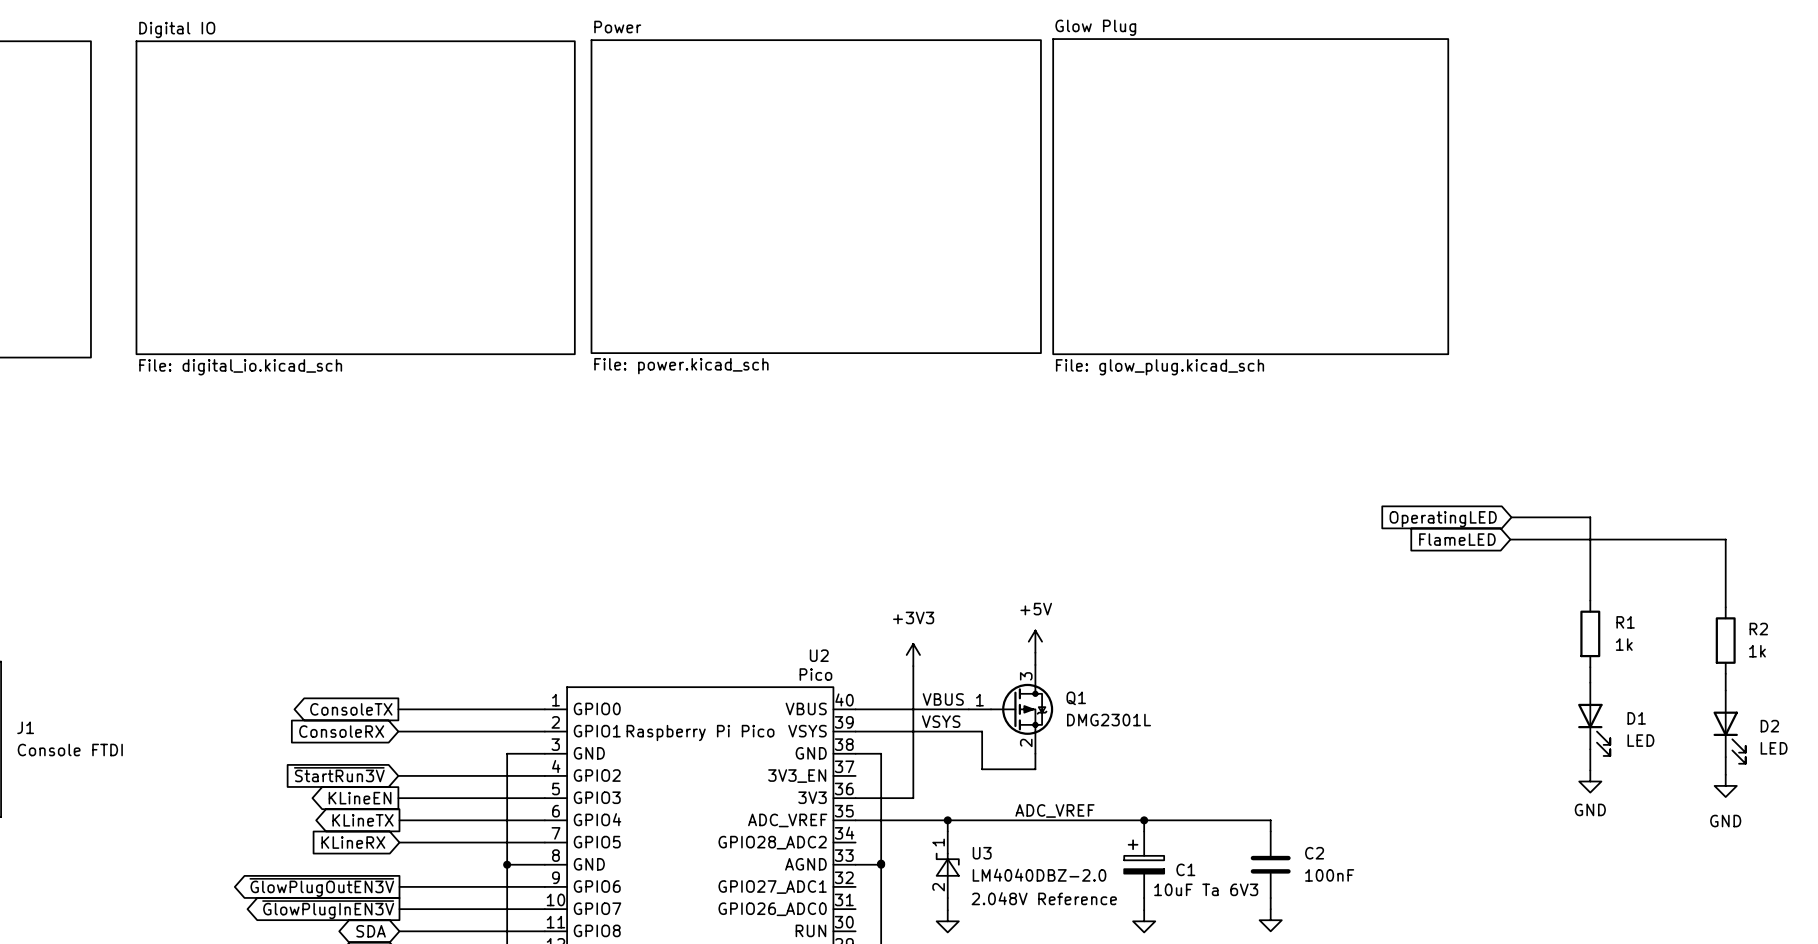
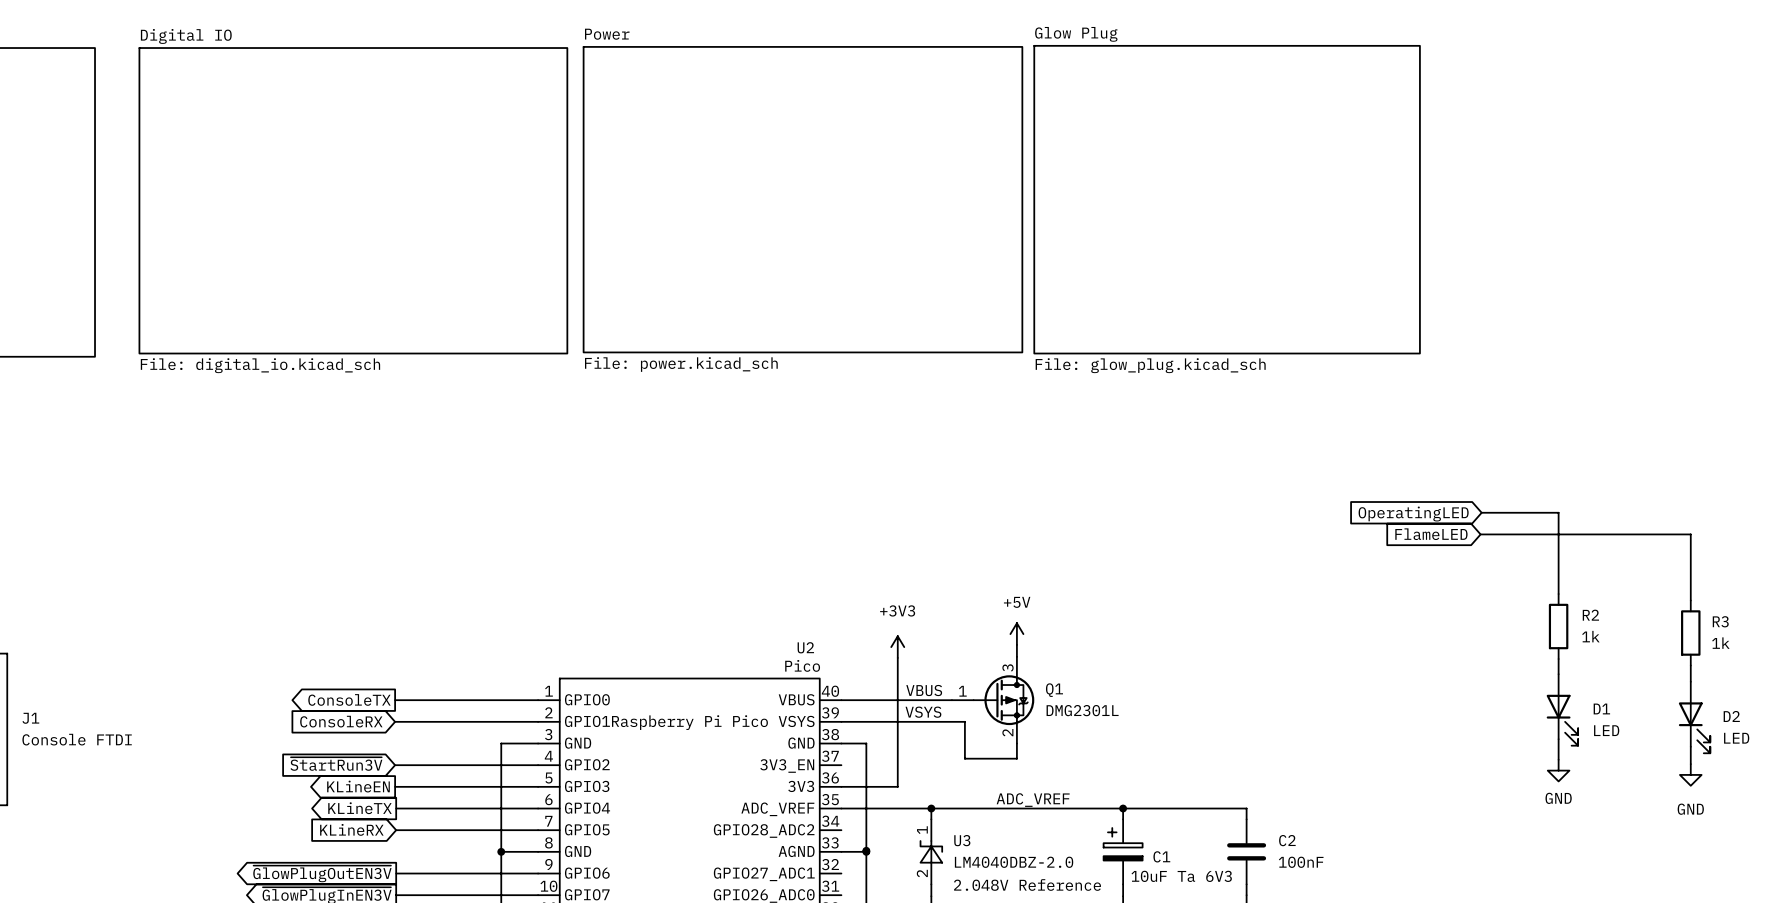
R1 name: R1 (1625, 622) -> R2 (1590, 615)
R2 name: R2 (1758, 629) -> R3 (1720, 621)

